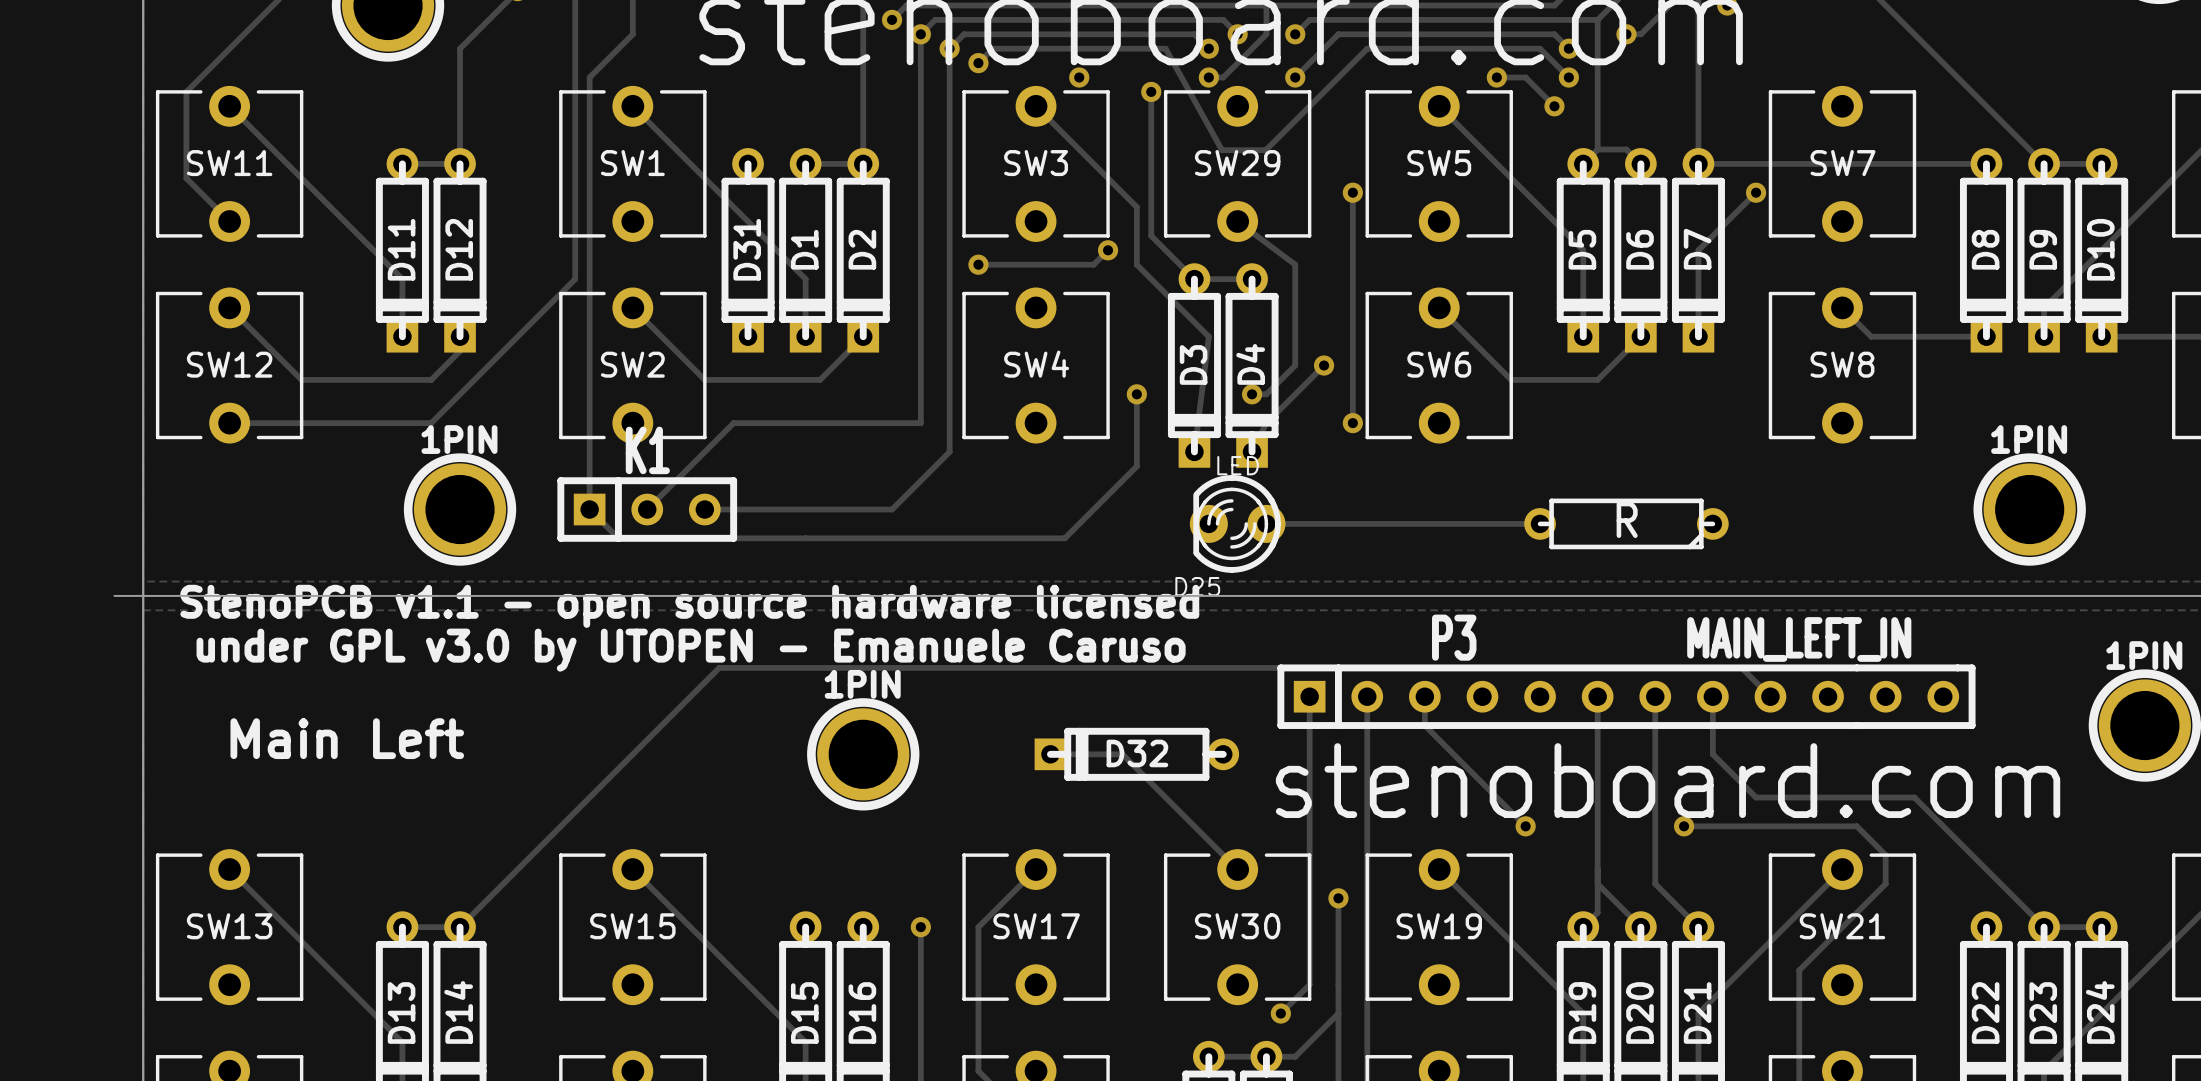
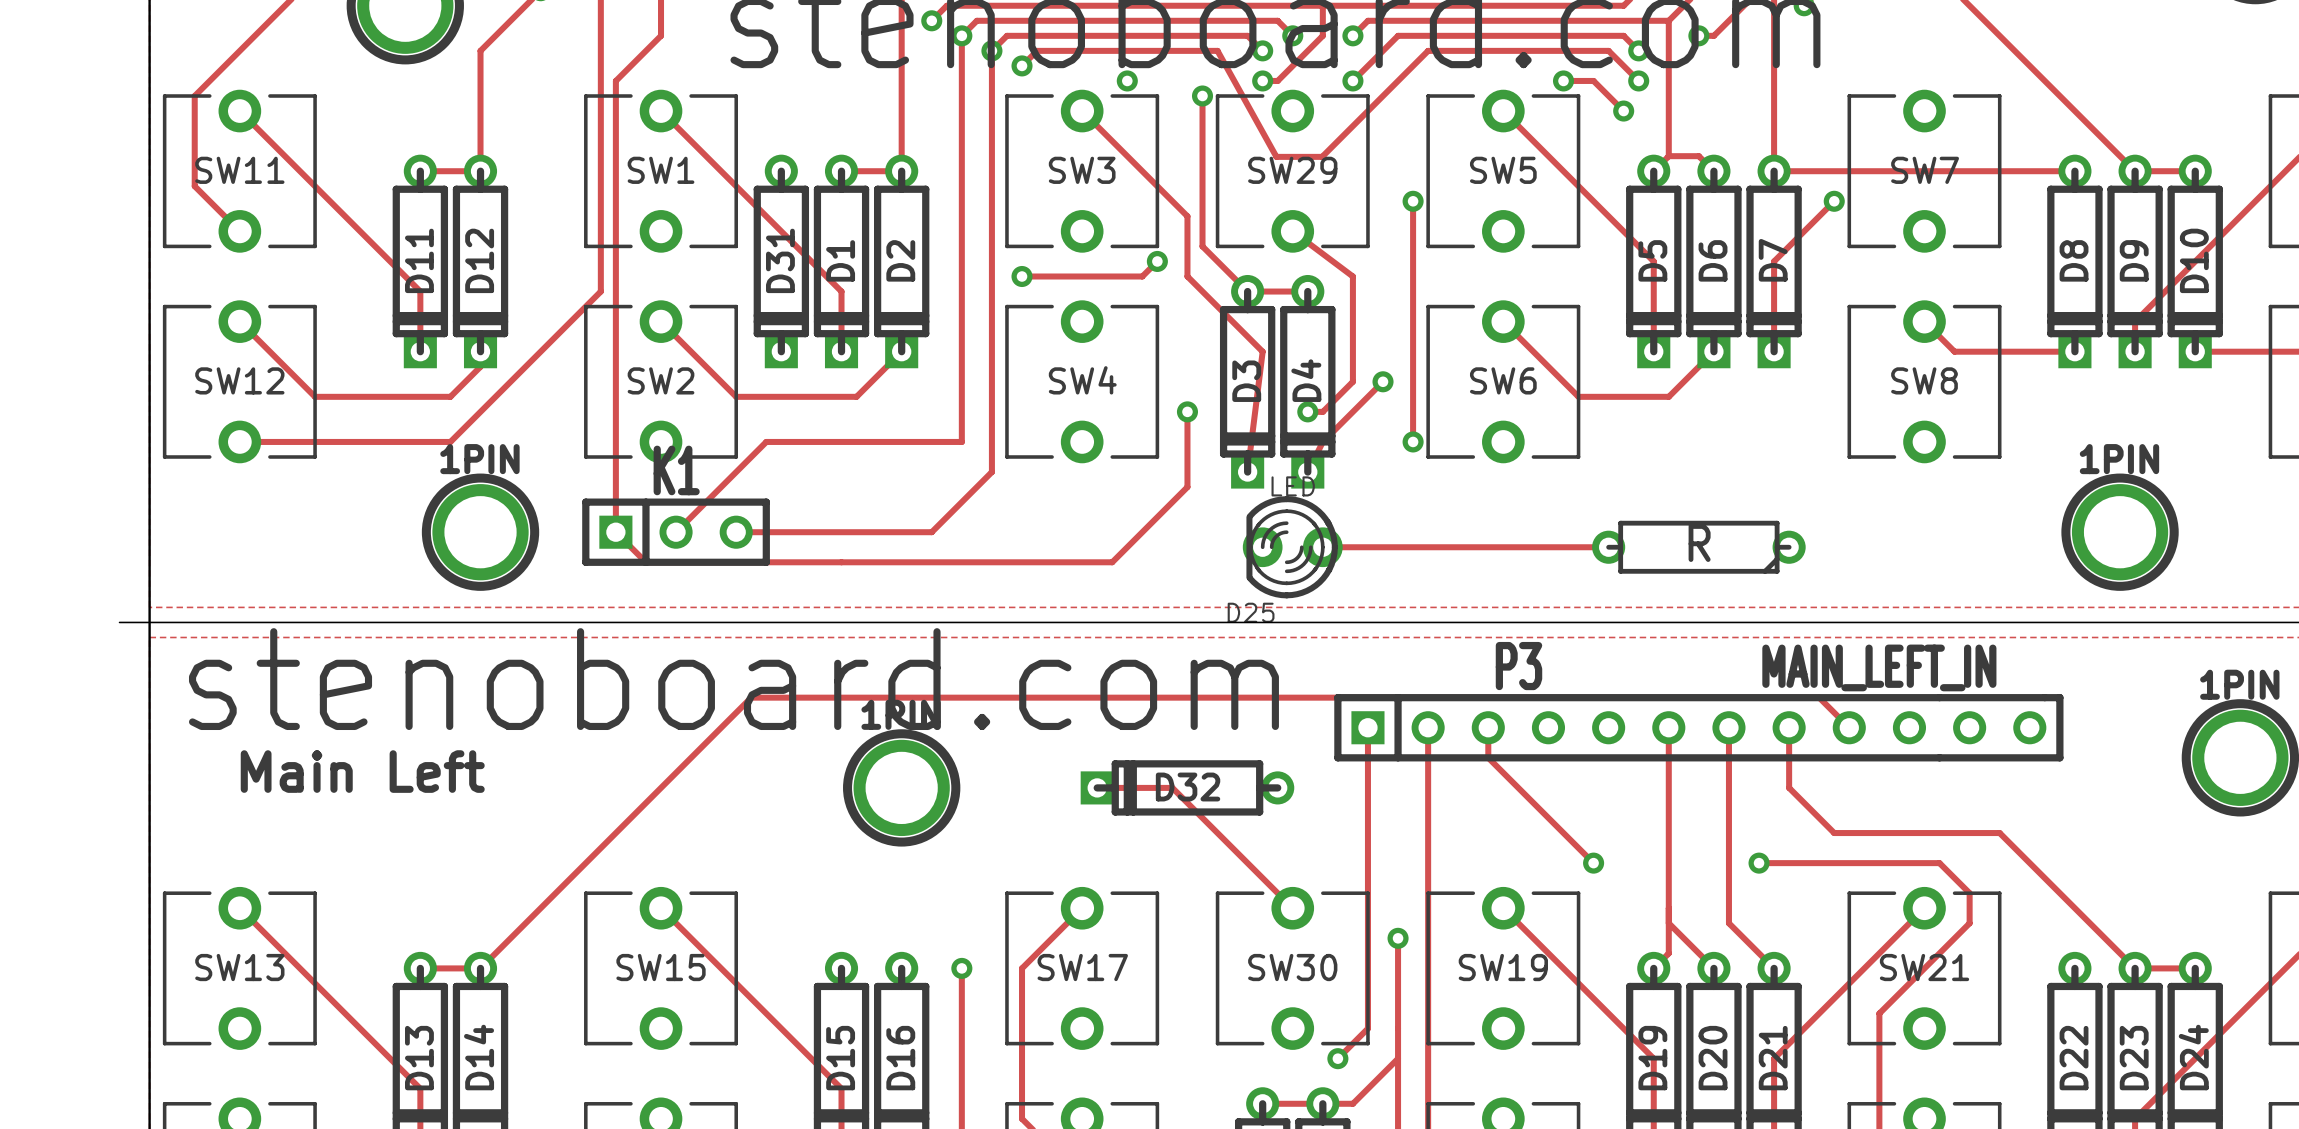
text: StenoPCB v1.1 - open source hardware licensed (689, 606) -> none
text: under GPL v3.0 by UTOPEN - Emanuele Caruso (691, 650) -> stenoboard.com (733, 679)
text: stenoboard.com (1668, 780) -> none

